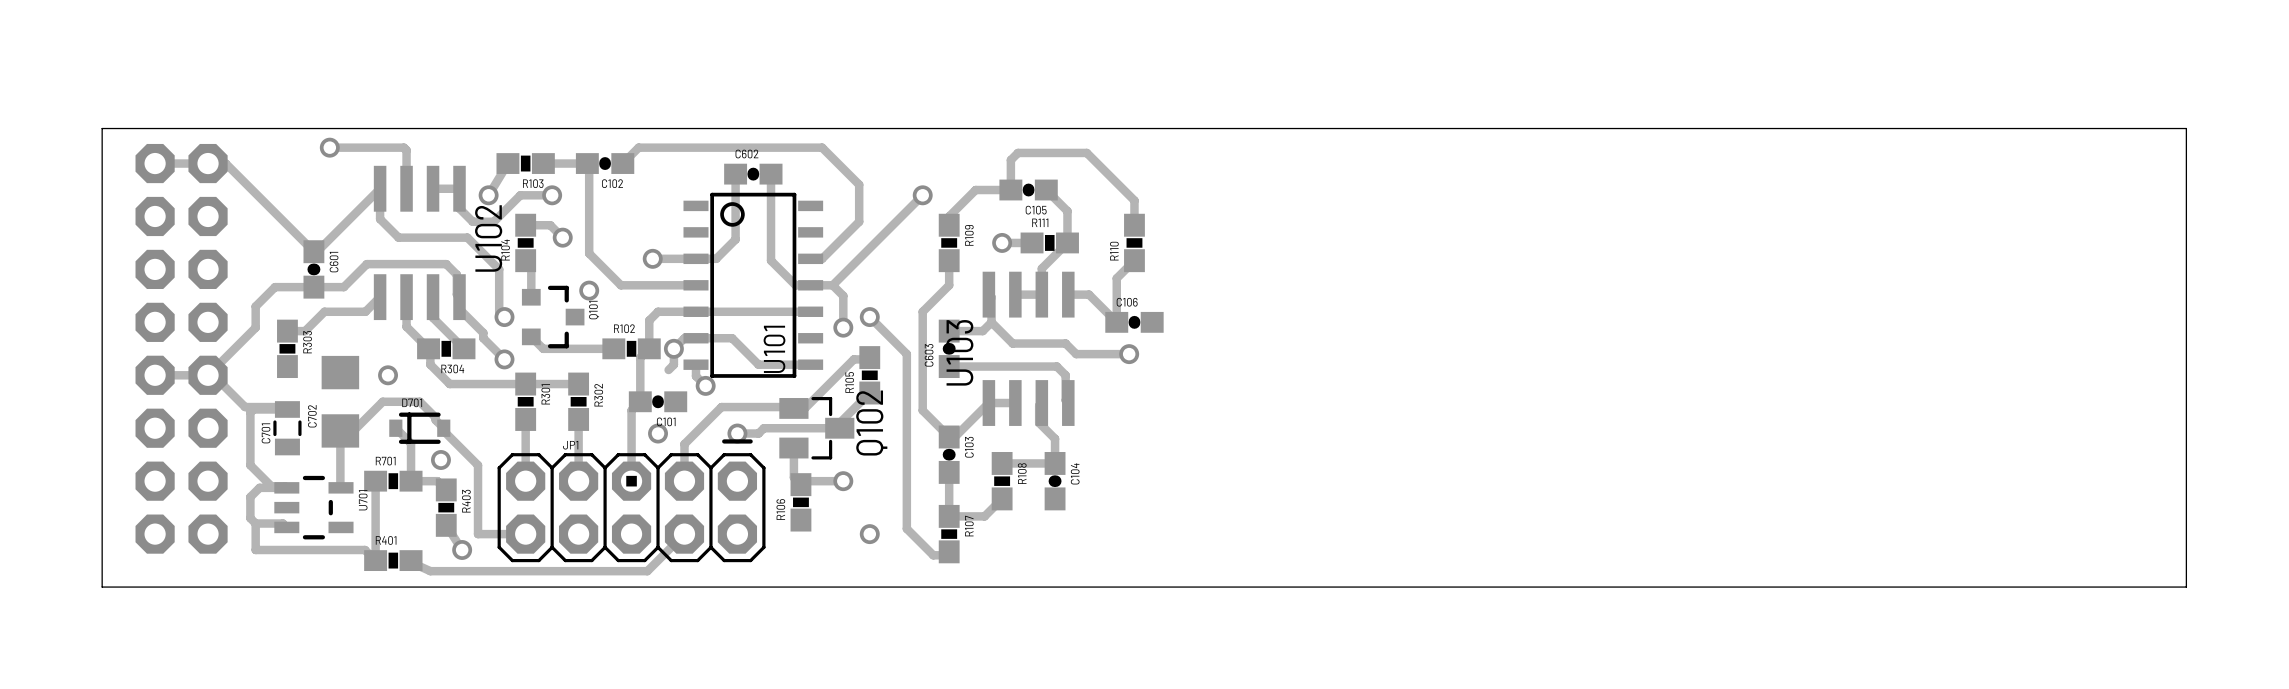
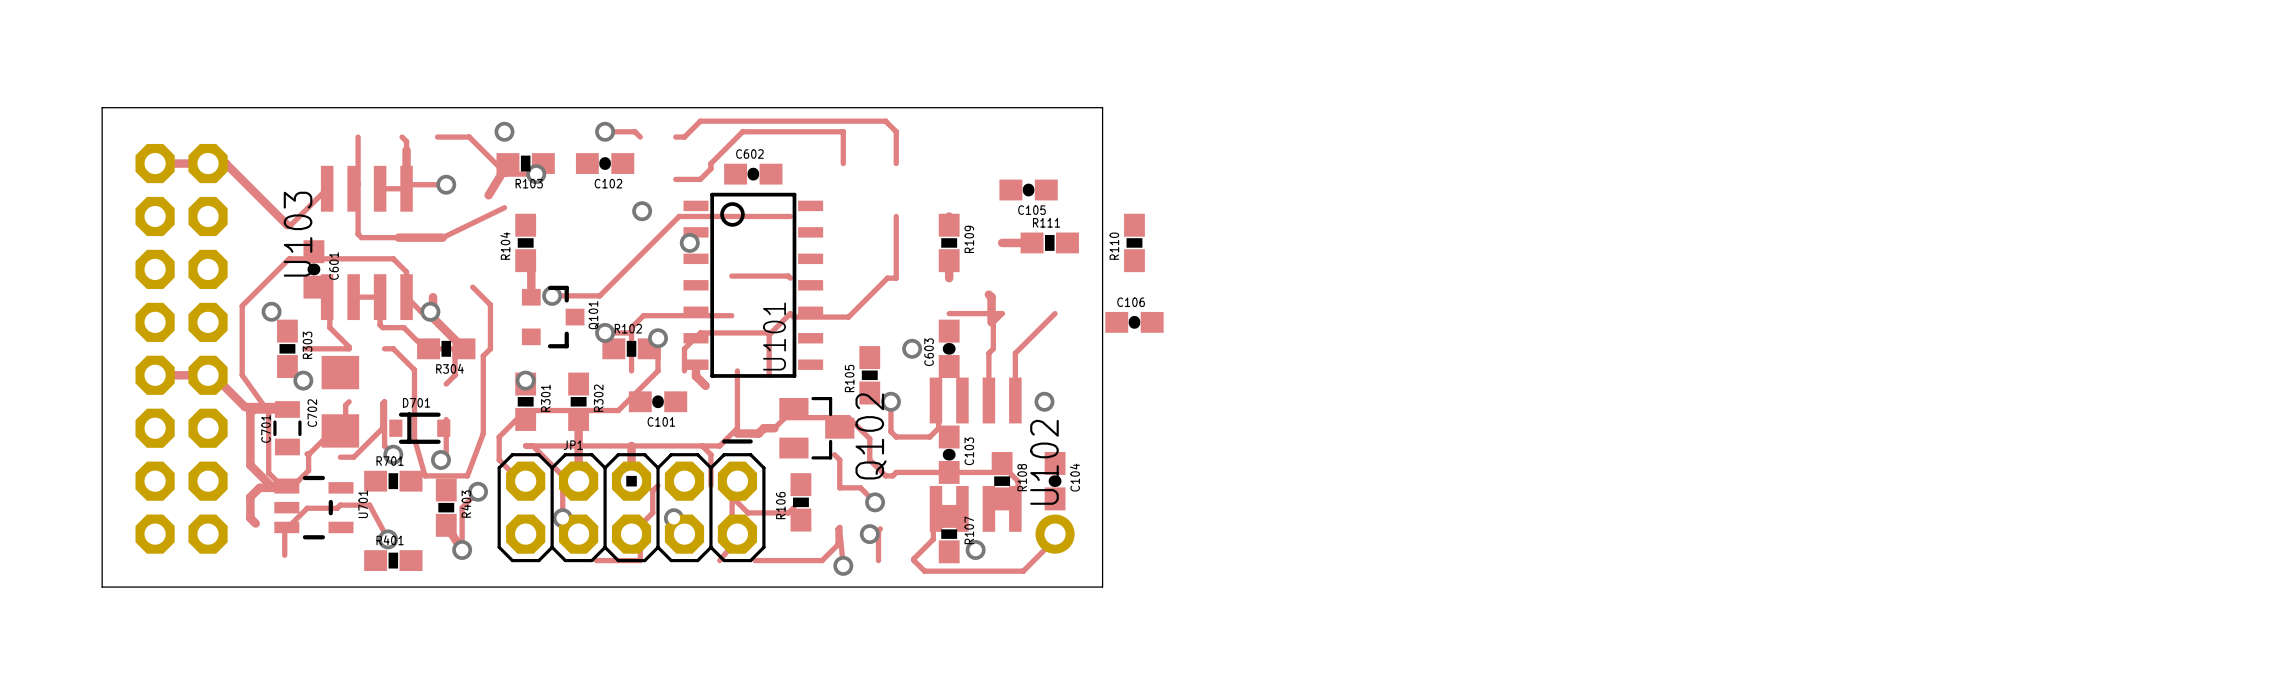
board edge: (102, 128) (2186, 128) (2186, 587) (1102, 587) -> (102, 128) (102, 107) (1102, 107) (1102, 587)
via: none -> (504, 131)
track: none -> (605, 131) (635, 131) (640, 137)
via: none -> (605, 131)
track: none -> (358, 137) (358, 234) (361, 237) (398, 237)
track: none -> (437, 137) (469, 137) (506, 174) (536, 174)
track: none -> (675, 137) (684, 137) (700, 121) (885, 121) (896, 131) (896, 163)
track: (329, 147) (403, 147) (406, 150) -> (402, 137) (406, 141) (406, 150)
via: (329, 147) -> none
track: (543, 163) (587, 163) (589, 165) (589, 253) (620, 285) (695, 285) -> none
track: (622, 163) (638, 147) (822, 147) (859, 184) (859, 221) (822, 258) (810, 258) -> none
track: none -> (843, 163) (843, 131) (742, 131) (710, 163) (710, 168) (700, 179) (675, 179)
via: none -> (536, 174)
track: (735, 174) (735, 239) (716, 258) (652, 258) -> none
track: (771, 174) (771, 260) (795, 285) (832, 285) -> none
track: none -> (446, 184) (410, 184) (406, 188) (380, 188)
via: none -> (446, 184)
track: (433, 188) (459, 188) (459, 208) (472, 221) (493, 221) (520, 195) (552, 195) -> none
track: (1046, 190) (1067, 211) (1067, 242) (1041, 268) (1041, 294) (1015, 294) -> none
via: (488, 195) -> none
via: (552, 195) -> none
track: (922, 195) (832, 285) -> none
via: (922, 195) -> none
via: none -> (642, 211)
track: none -> (790, 216) (679, 216) (599, 295) (552, 295)
track: none -> (896, 216) (896, 278) (887, 278) (848, 317) (793, 317) (790, 313) (771, 332) (700, 332) (684, 348) (684, 370)
track: (949, 216) (975, 190) (1010, 190) (1010, 160) (1018, 152) (1086, 152) (1134, 200) (1134, 225) -> none
track: (287, 225) (313, 251) (317, 251) (380, 188) (380, 219) (398, 237) -> (287, 225) (290, 225) (327, 188)
track: (525, 225) (550, 225) (562, 237) -> none
track: (442, 237) (467, 237) (499, 269) (499, 311) (504, 317) -> (442, 237) (504, 207)
via: (562, 237) -> none
U102 position: (419, 242) -> (975, 454)
via: none -> (689, 242)
via: (1002, 242) -> none
via: (652, 258) -> none
track: (1134, 260) (1116, 278) (1116, 322) (1089, 294) (1068, 294) -> none
track: none -> (731, 276) (788, 276) (790, 278)
track: (949, 278) (949, 285) (922, 311) (922, 410) (949, 436) (954, 436) (988, 403) (1015, 403) -> none
track: (832, 285) (843, 295) (843, 327) -> none
track: none -> (472, 287) (490, 304) (490, 348) (483, 355) (483, 433) (467, 475) (425, 475) (414, 438) (414, 370) (393, 348) (384, 348)
via: (589, 290) -> none
via: none -> (552, 295)
track: none -> (327, 297) (329, 299) (329, 327) (349, 348) (305, 348)
track: none -> (353, 297) (380, 297) (380, 325) (382, 327) (403, 327) (425, 348) (455, 348) (455, 375) (446, 384)
track: (380, 297) (365, 311) (324, 311) (305, 331) (287, 331) -> none
track: (406, 297) (406, 326) (430, 350) (430, 364) (449, 384) (578, 384) -> none
via: none -> (271, 311)
track: none -> (430, 311) (421, 311) (406, 297) (406, 272) (393, 258) (289, 258) (242, 305) (242, 375) (268, 412) (268, 473) (276, 481) (298, 481) (308, 470) (307, 454) (345, 417) (345, 405) (349, 401)
via: none -> (430, 311)
track: (810, 311) (658, 311) (649, 320) (649, 348) (640, 357) (640, 401) (631, 410) (631, 445) -> none
track: none -> (949, 313) (1002, 313) (993, 322) (993, 348) (988, 353) (988, 400)
track: none -> (1055, 313) (1015, 353) (1015, 400)
track: none -> (731, 315) (643, 315) (631, 327) (631, 370)
via: (504, 317) -> none
track: (869, 317) (906, 354) (906, 528) (933, 555) (945, 555) (949, 551) -> none
via: (869, 317) -> none
via: (843, 327) -> none
track: (949, 331) (982, 331) (991, 322) (1012, 343) (1065, 343) (1076, 354) (1129, 354) -> none
track: none -> (605, 332) (631, 332)
via: none -> (605, 332)
track: none -> (769, 332) (769, 375)
track: (531, 336) (543, 348) (613, 348) -> none
track: none -> (658, 338) (658, 370) (618, 410) (525, 410) (499, 436) (499, 460) (525, 486) (525, 489)
via position: (673, 348) -> (658, 338)
via: none -> (912, 348)
U103 position: (1028, 348) -> (366, 242)
via: (1129, 354) -> none
track: (869, 357) (867, 359) (853, 359) (804, 408) (721, 407) (684, 444) (684, 481) -> none
track: (504, 359) (483, 338) (483, 332) (459, 309) (459, 297) (456, 294) (456, 274) (446, 264) (366, 264) (343, 287) (275, 287) (255, 306) (255, 327) (208, 375) -> none
via position: (504, 359) -> (525, 380)
track: (810, 364) (758, 364) (732, 338) (684, 338) (673, 348) (673, 364) (668, 370) -> none
track: (949, 366) (1056, 366) (1065, 375) (1065, 400) (1068, 403) -> none
track: none -> (737, 370) (737, 428) (719, 445) (525, 445)
via: (388, 375) -> none
via: none -> (303, 380)
via: (705, 385) -> none
track: (869, 393) (839, 423) (839, 428) (774, 428) -> (1015, 508) (1018, 506) (1018, 481) (1009, 472) (896, 472) (892, 475) (885, 475) (869, 460) (869, 438) (848, 417) (785, 417) (774, 428)
track: none -> (935, 400) (938, 403) (938, 428) (929, 436) (896, 436) (890, 431) (890, 401)
via: none -> (890, 401)
via: none -> (1044, 401)
track: (1041, 403) (1039, 405) (1039, 422) (1055, 438) (1055, 463) (1002, 463) -> none
track: none -> (446, 419) (446, 454)
track: (525, 419) (525, 481) -> none
track: (395, 428) (411, 443) (411, 481) (437, 481) (446, 489) -> none
via: (658, 433) -> none
via: (737, 433) -> none
track: none -> (532, 445) (562, 475) (562, 518)
track: none -> (702, 445) (710, 454) (710, 485)
track: (793, 448) (793, 477) (800, 484) (804, 481) (843, 481) -> none
track: none -> (393, 454) (384, 445) (384, 401) (382, 403) (382, 428) (353, 457) (340, 457)
via: none -> (393, 454)
track: none -> (834, 454) (839, 459) (839, 487) (860, 487) (875, 502)
track: (949, 472) (949, 516) (984, 516) (1002, 498) -> none
track: (375, 481) (375, 560) (365, 549) (255, 549) (255, 523) (282, 523) (286, 527) -> none
via position: (843, 481) -> (875, 502)
track: none -> (658, 485) (652, 490) (652, 512) (640, 525) (640, 560) (596, 560)
track: (341, 487) (340, 430) (353, 430) (382, 401) (419, 401) (435, 417) (443, 431) (478, 465) (478, 534) (525, 534) -> none
track: none -> (478, 491) (462, 507) (462, 555)
via: none -> (478, 491)
track: none -> (793, 507) (788, 512) (748, 512) (737, 502) (737, 485) (732, 490) (732, 523) (735, 541) (719, 560)
track: none -> (962, 508) (935, 508) (933, 511) (933, 539) (913, 558) (924, 571) (1023, 571) (1055, 539)
via: none -> (562, 518)
via: none -> (673, 518)
track: none -> (880, 528) (878, 530) (878, 560)
track: (684, 534) (647, 571) (430, 571) (411, 562) (411, 560) -> none
part: none -> (1055, 534)
track: none -> (388, 539) (369, 505) (340, 505) (337, 508) (307, 508) (284, 530) (284, 555)
via: none -> (388, 539)
via: none -> (975, 549)
track: none -> (755, 560) (822, 560) (838, 544) (838, 529) (839, 527) (843, 565)
via: none -> (843, 565)

